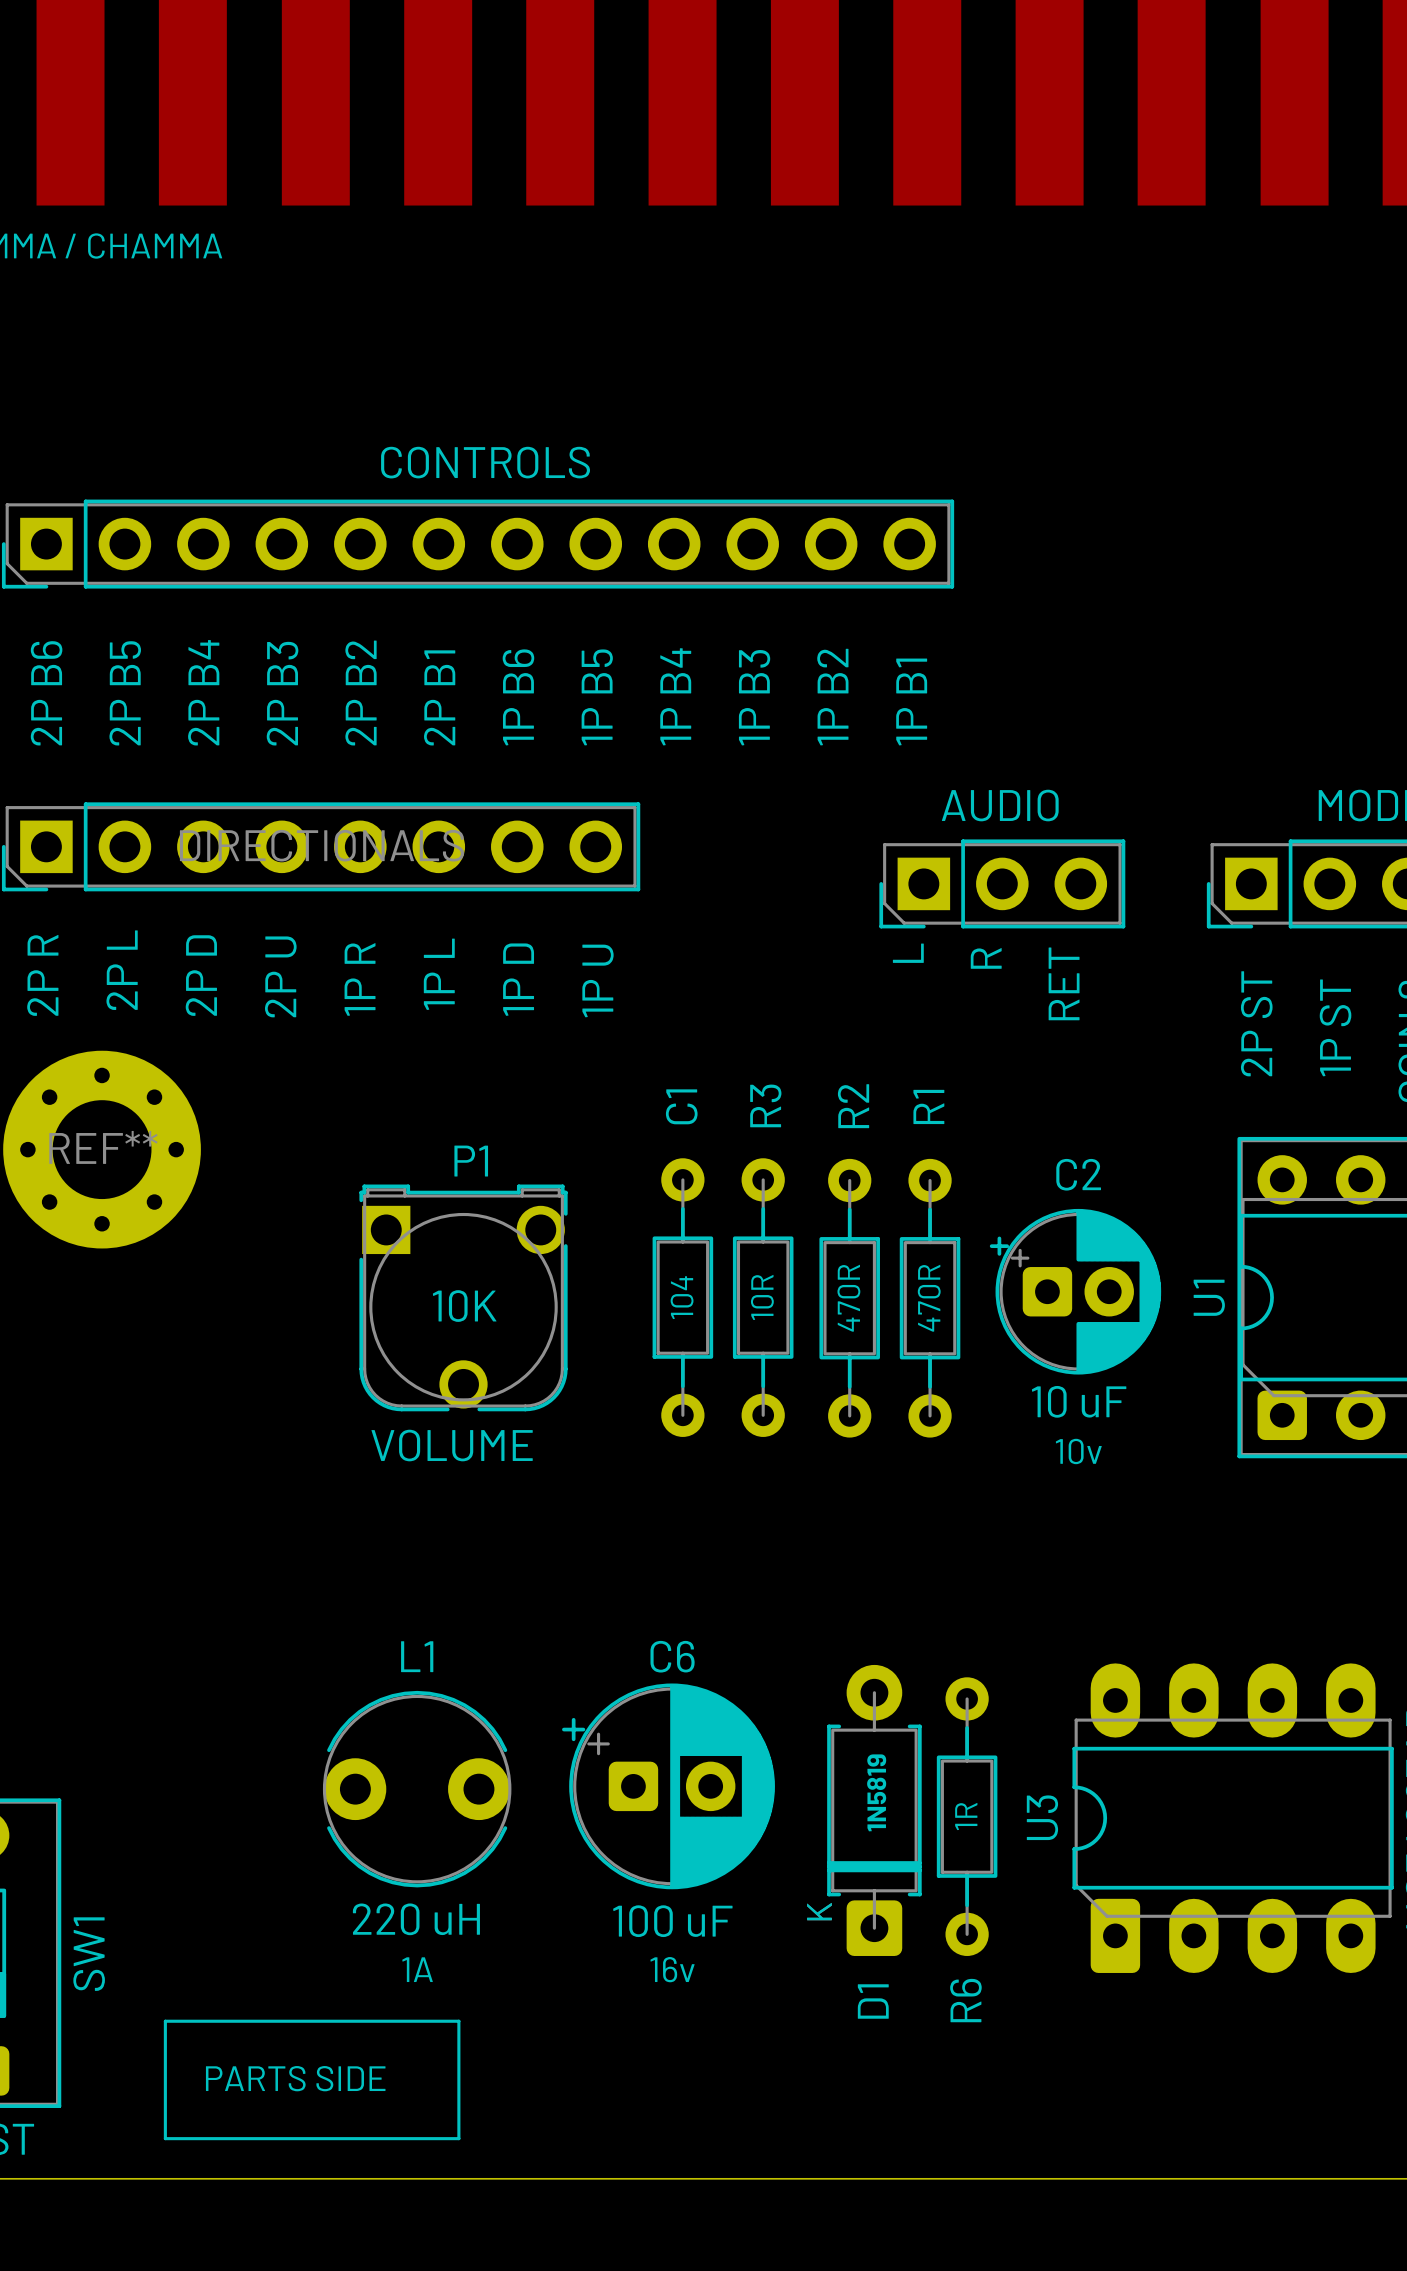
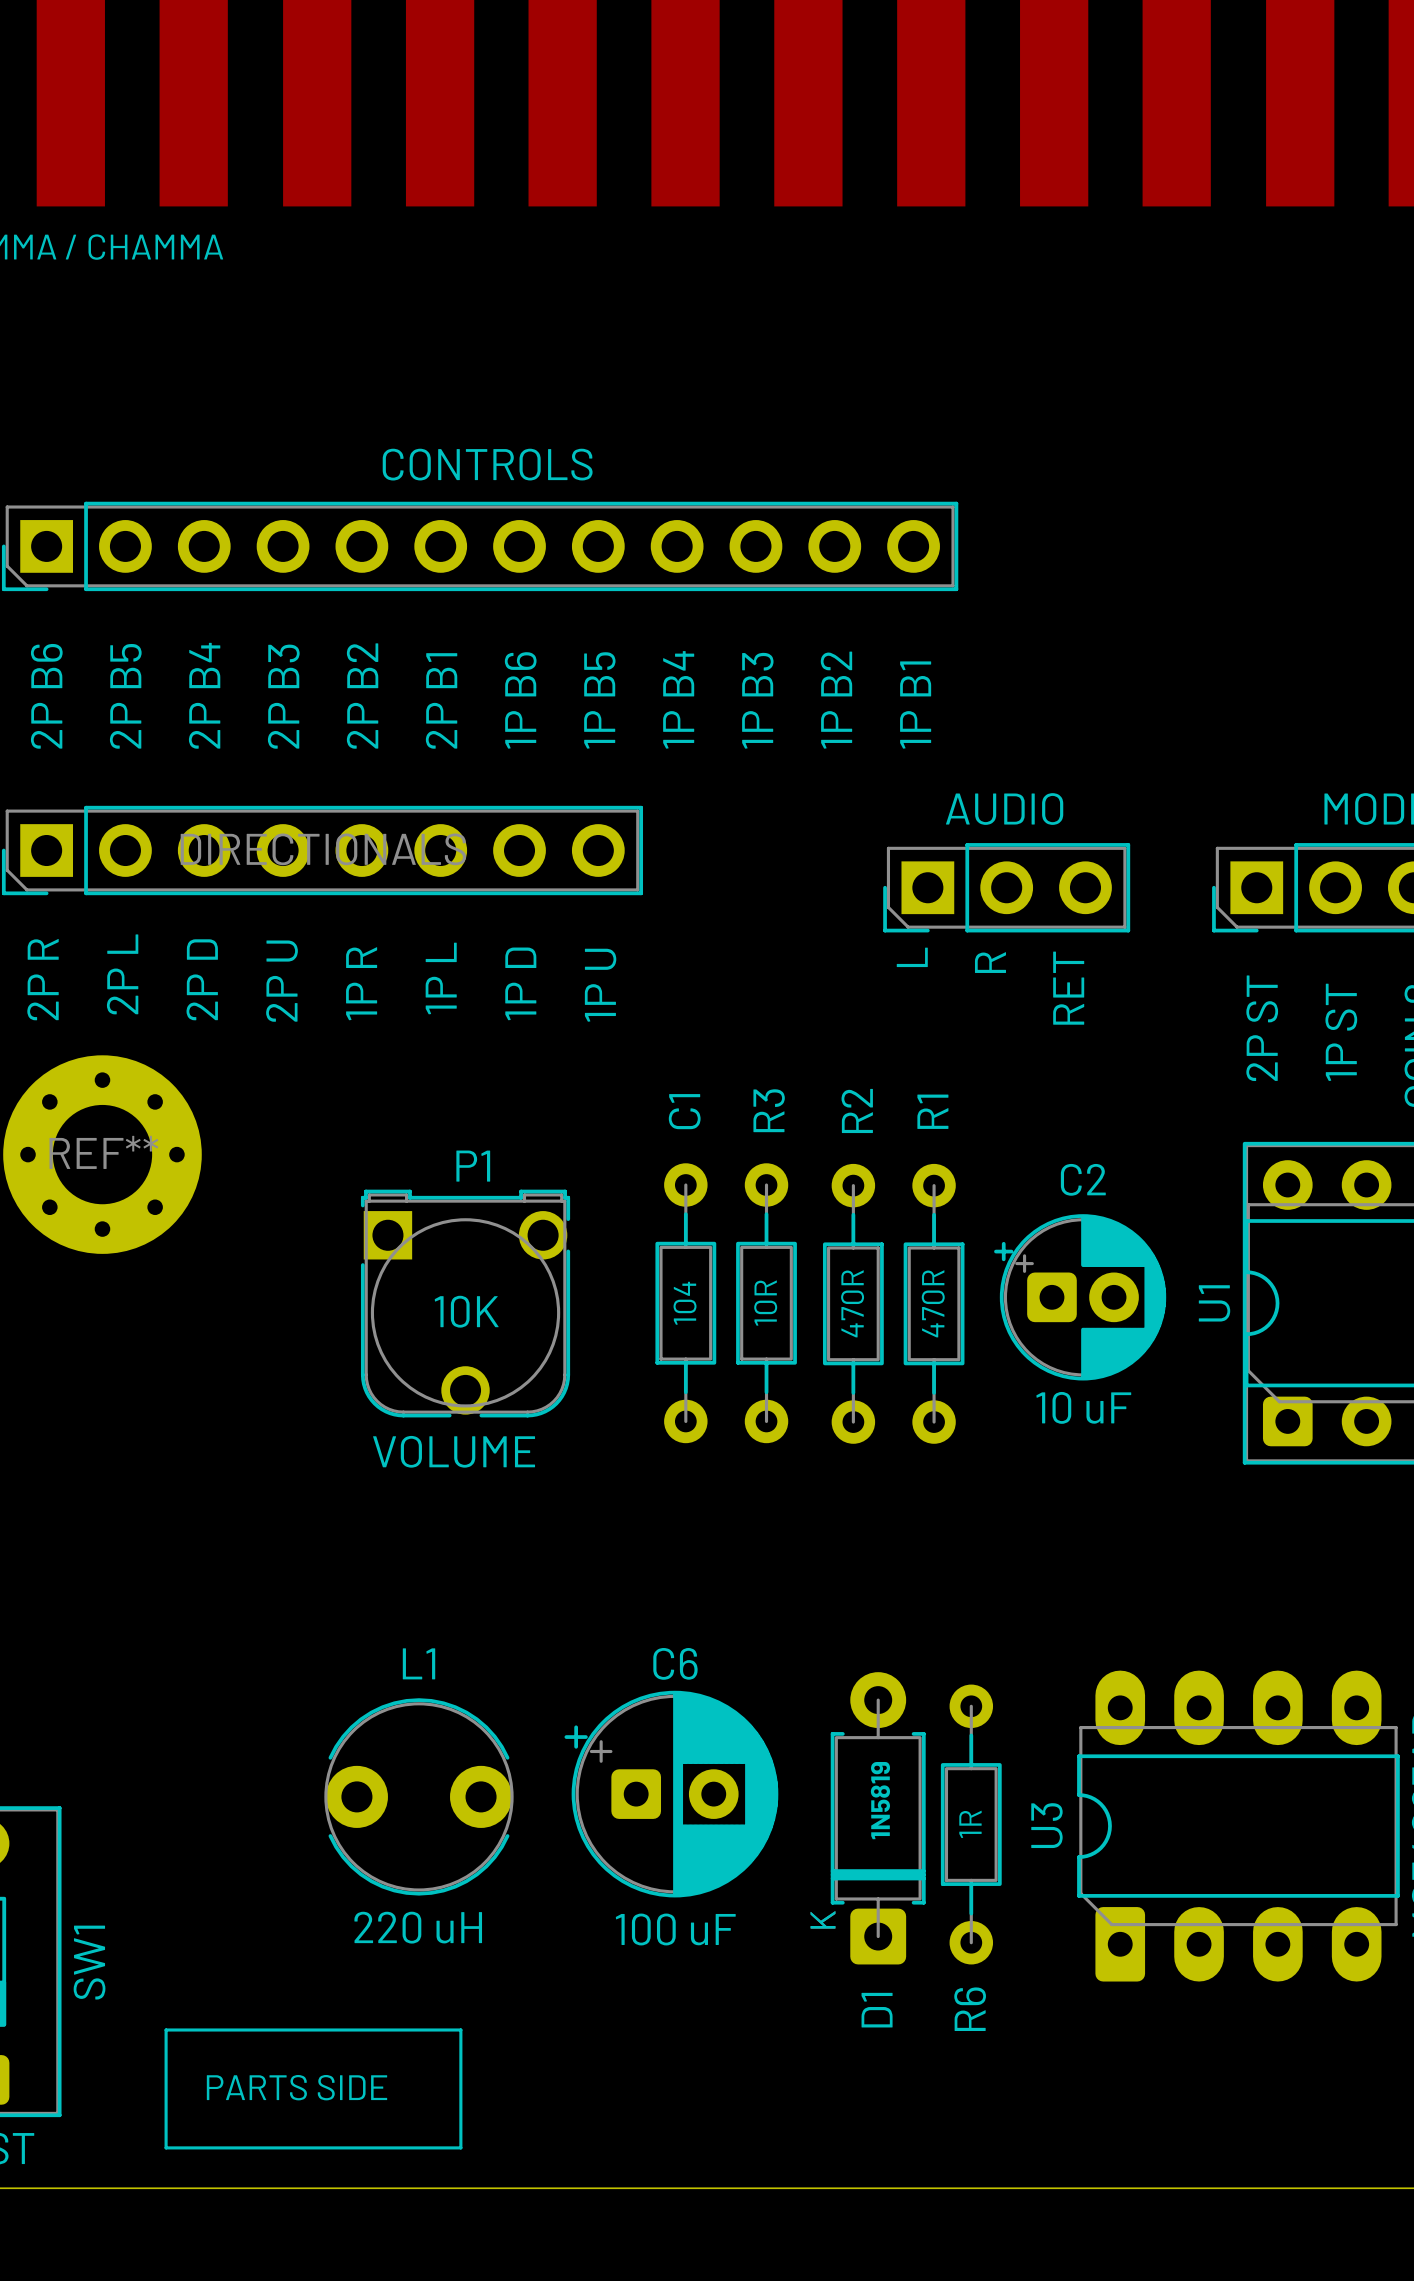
text: 10v (1078, 1451) -> none
text: 1A (417, 1969) -> none
text: 16v (672, 1969) -> none

